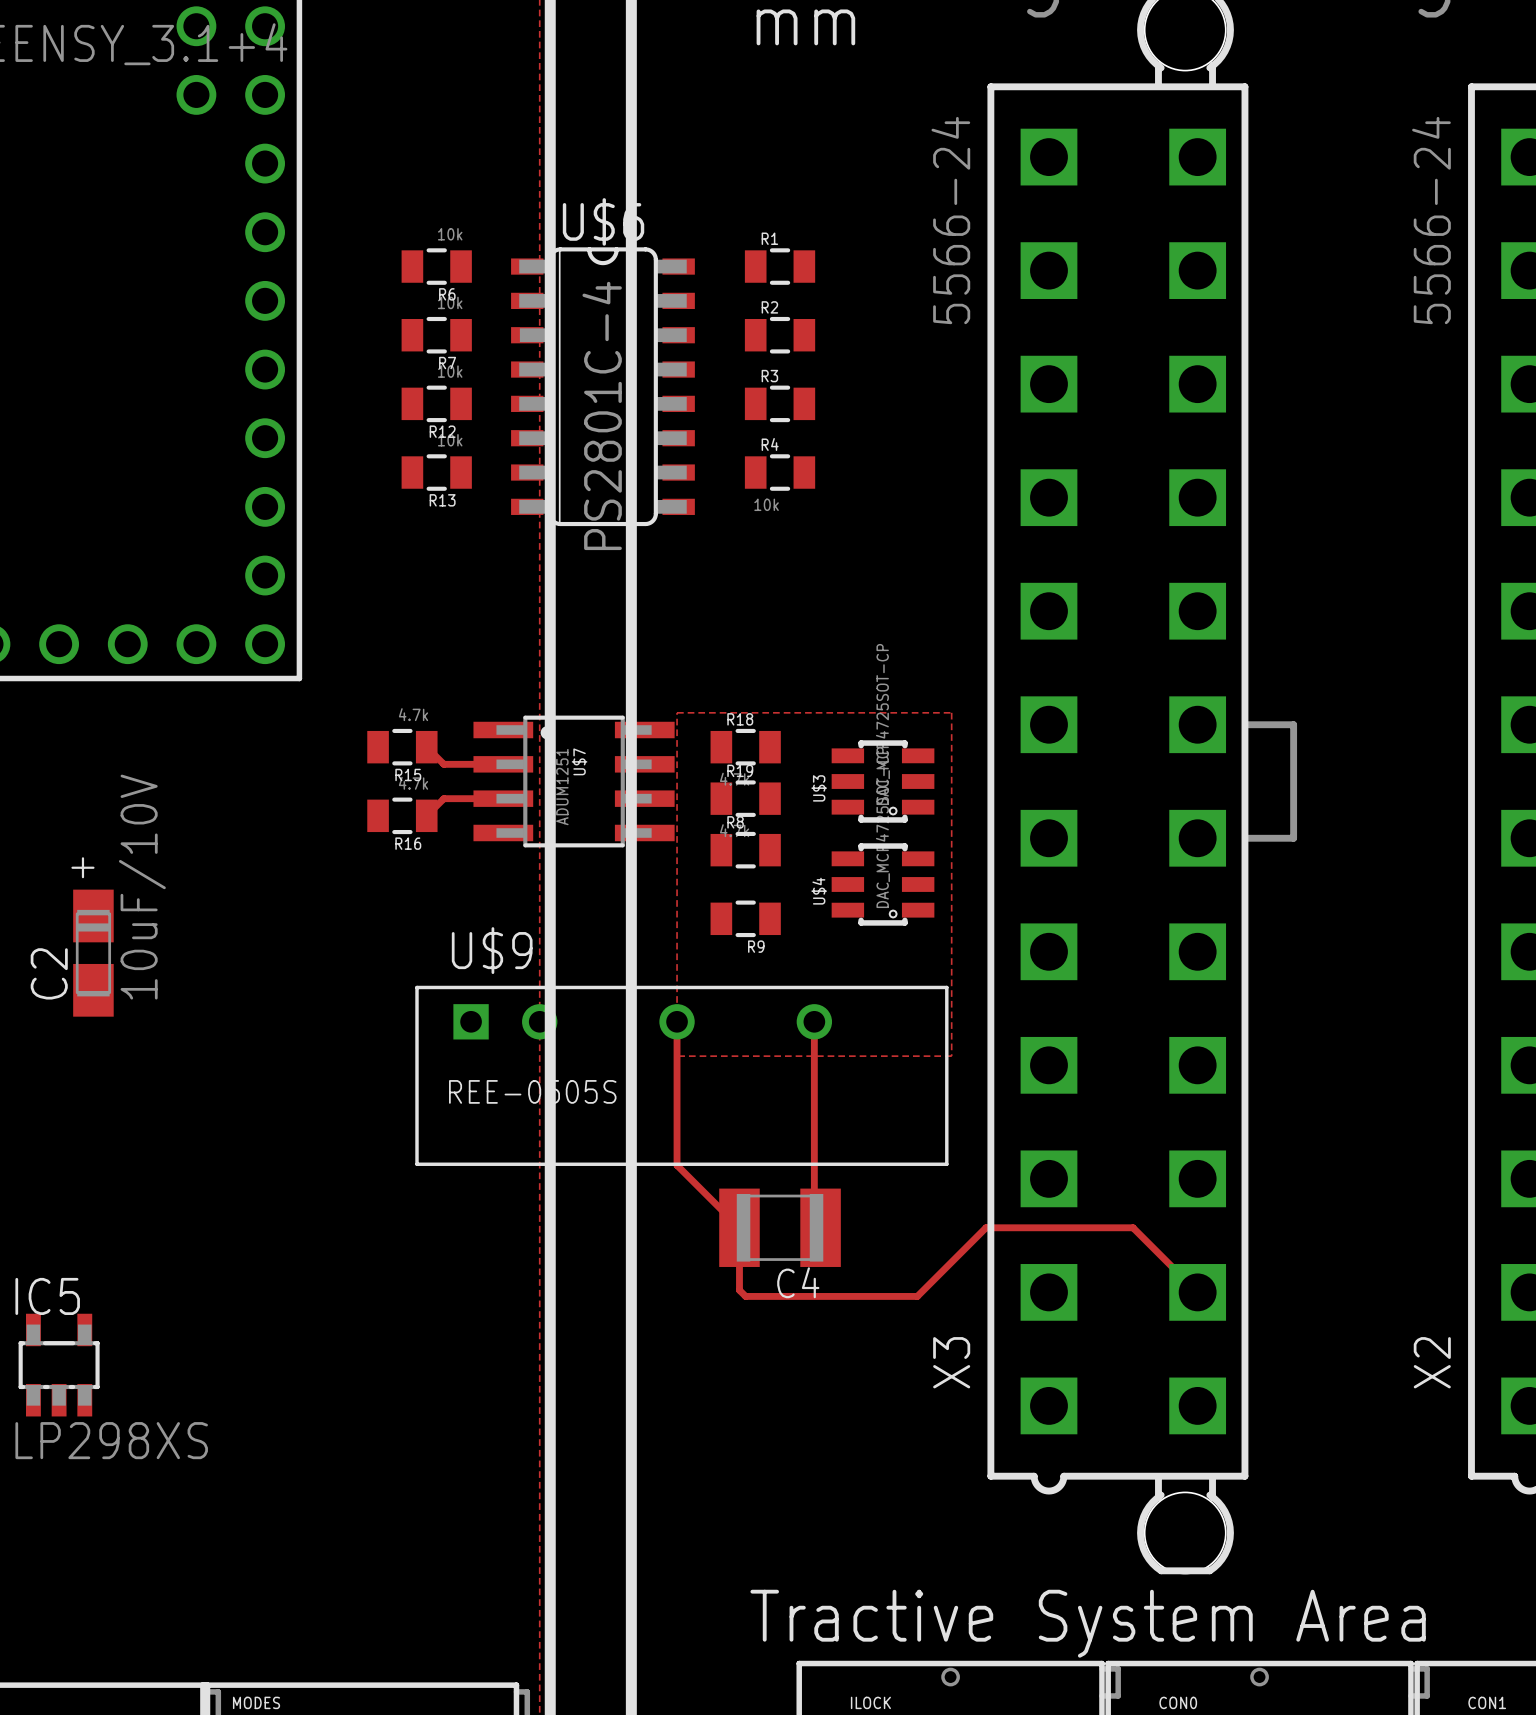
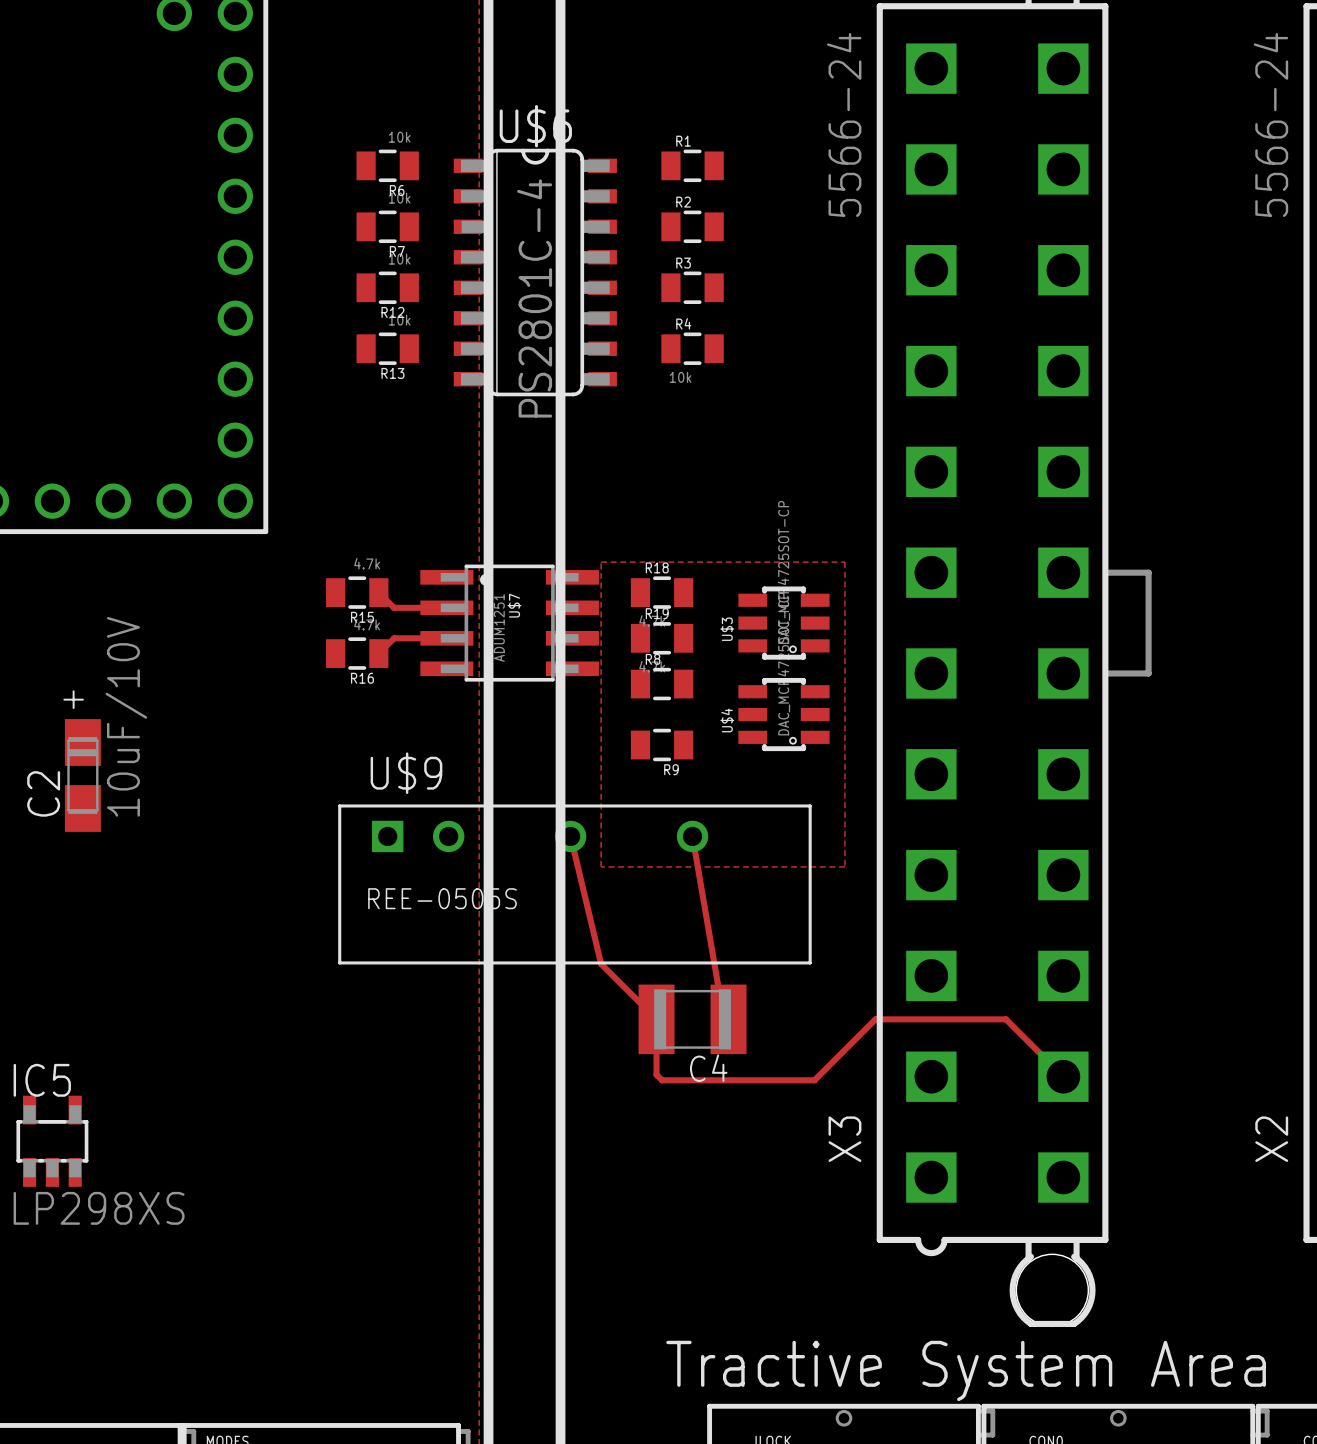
track: (677, 1021) (677, 1165) -> (570, 836) (601, 963)
track: (814, 1021) (814, 1221) -> (692, 836) (723, 1013)
U$9 position: (681, 1075) -> (574, 884)

